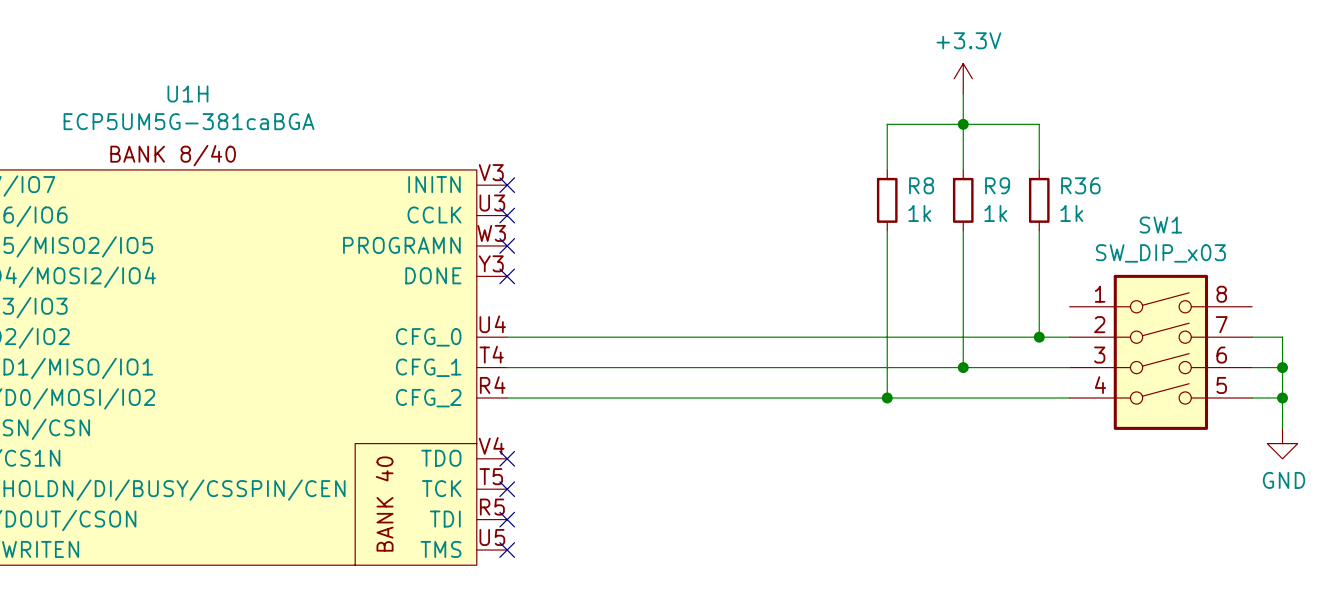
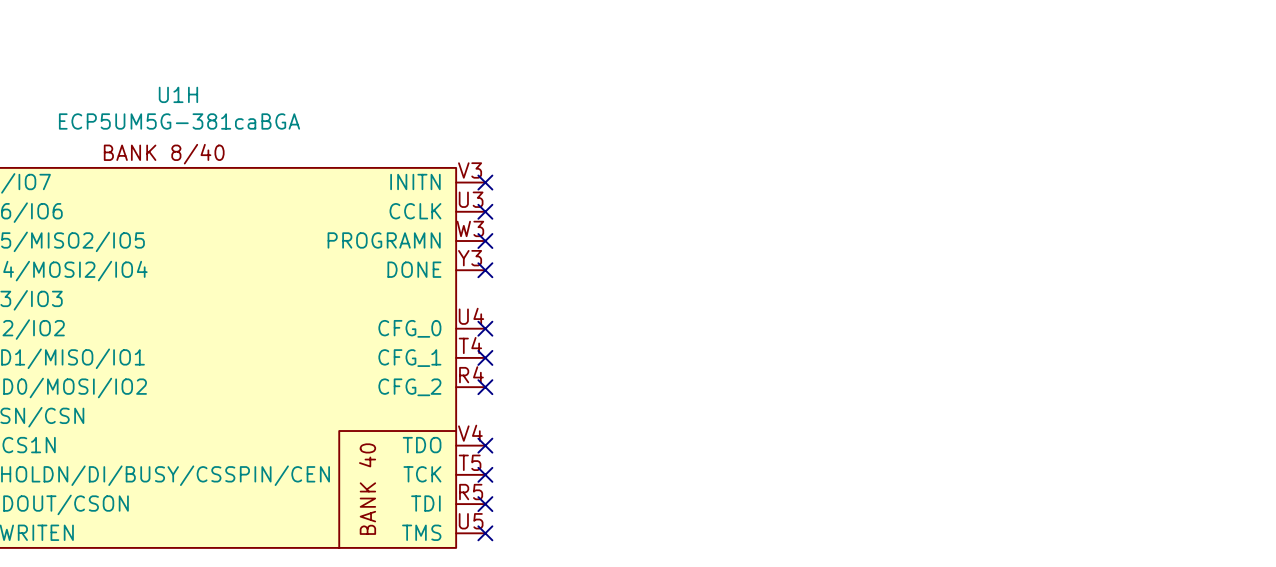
power symbol: +3.3V (963, 78) -> none
wire: (963, 93) (963, 169) -> none
junction: (963, 124) -> none
wire: (887, 169) (887, 124) (1039, 124) (1039, 169) -> none
R8: 1k (887, 200) -> none
R9: 1k (963, 200) -> none
R36: 1k (1039, 200) -> none
wire: (887, 230) (887, 397) -> none
wire: (963, 230) (963, 367) -> none
wire: (1039, 230) (1039, 337) -> none
wire: (507, 337) (1069, 337) -> none
no-connect mark: none -> (485, 328)
junction: (1039, 337) -> none
wire: (1252, 337) (1282, 337) (1282, 428) -> none
SW1: SW_DIP_x03 (1160, 352) -> none
wire: (507, 367) (1069, 367) -> none
no-connect mark: none -> (485, 357)
junction: (963, 367) -> none
wire: (1252, 367) (1282, 367) -> none
junction: (1282, 367) -> none
wire: (507, 397) (1069, 397) -> none
no-connect mark: none -> (485, 387)
junction: (887, 397) -> none
wire: (1252, 397) (1282, 397) -> none
junction: (1282, 397) -> none
power symbol: GND (1282, 443) -> none

